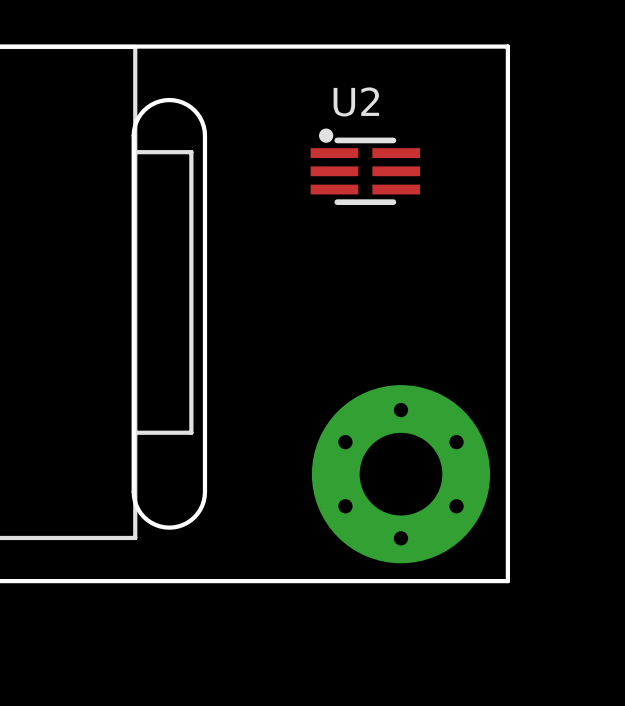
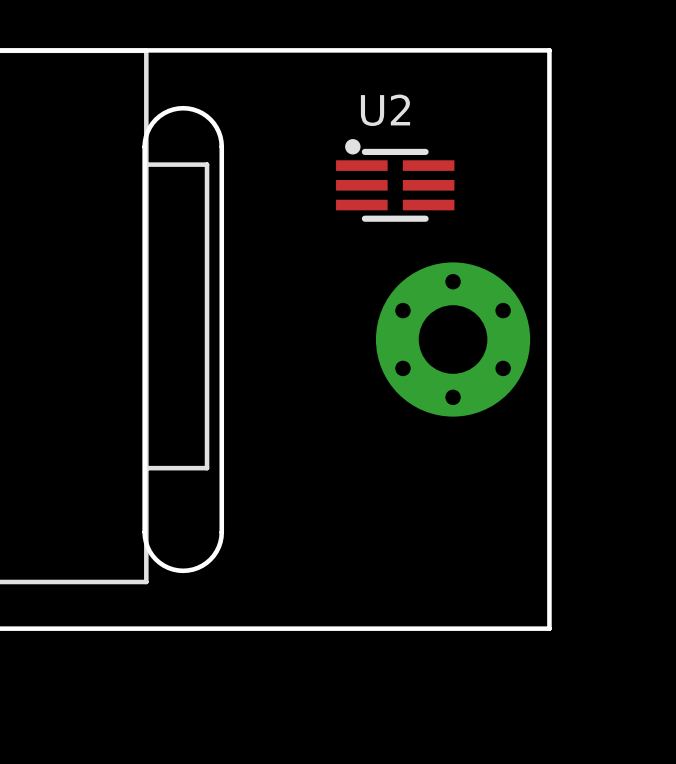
part: none -> (453, 339)
part: (400, 474) -> none

